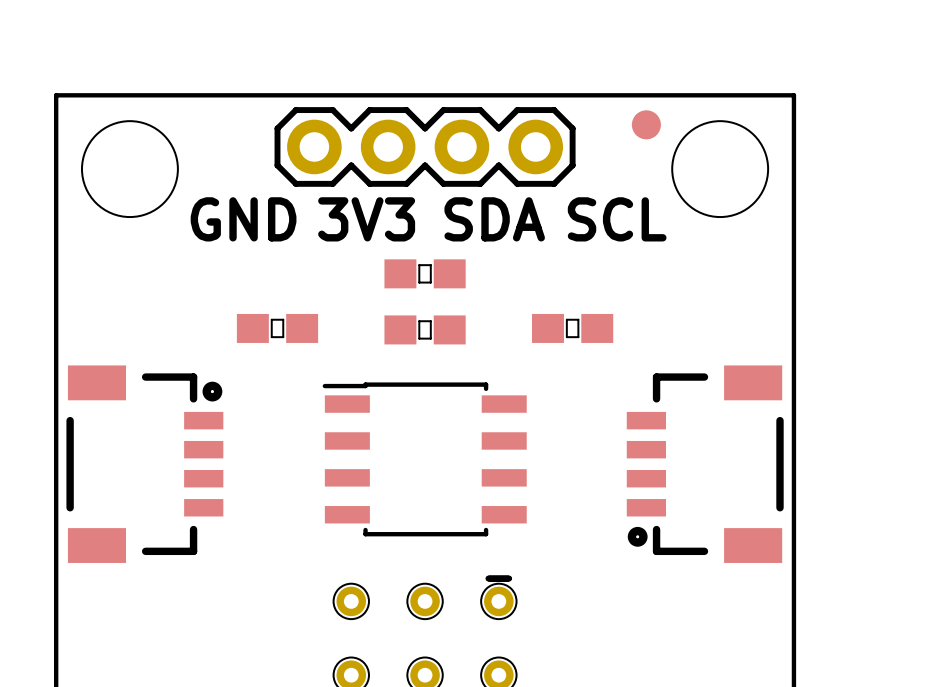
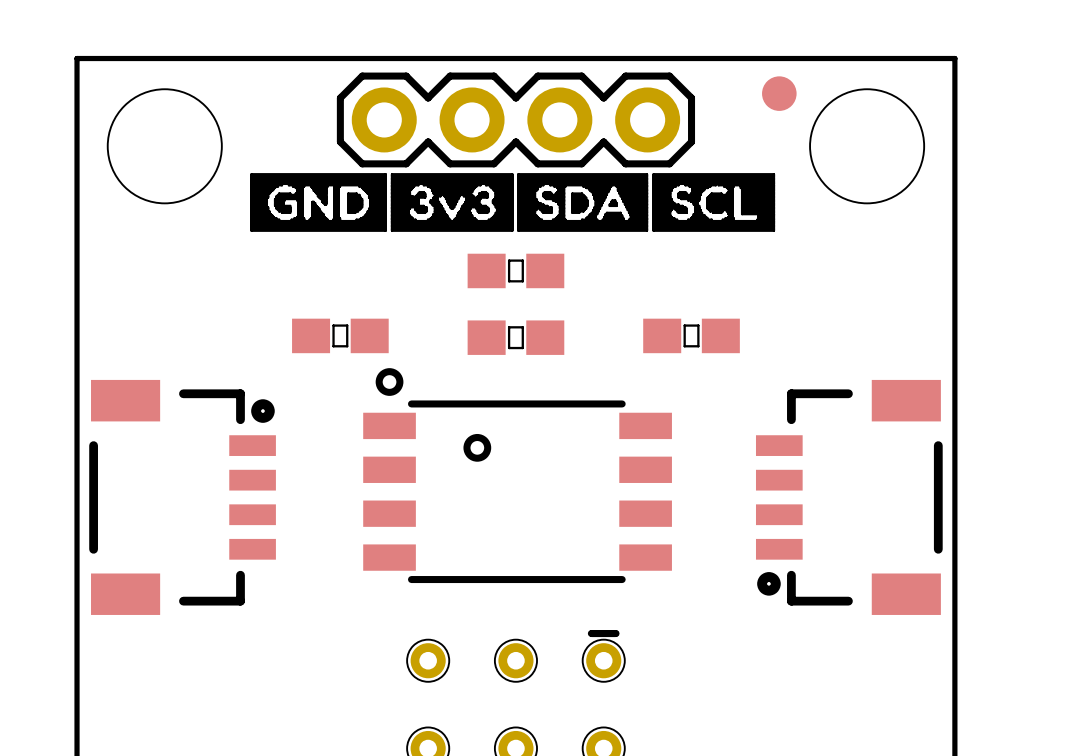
drawing: none -> [250, 173, 776, 232]
text: GND (243, 219) -> none
text: 3V3 (366, 219) -> none
text: SDA (494, 219) -> none
text: SCL (617, 219) -> none
part footprint: [322, 382, 527, 537] -> [363, 368, 672, 584]

